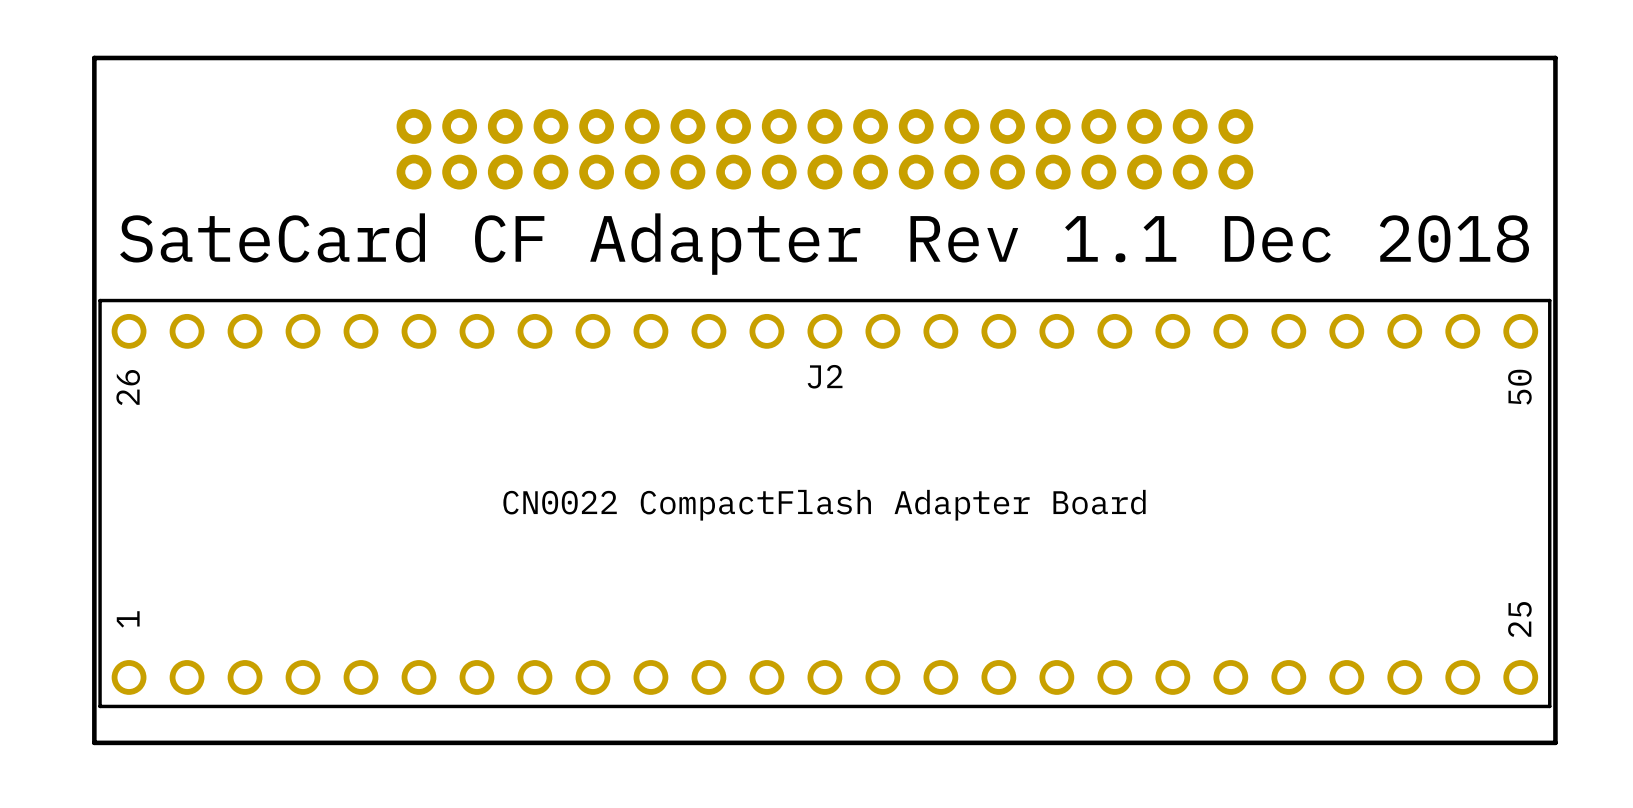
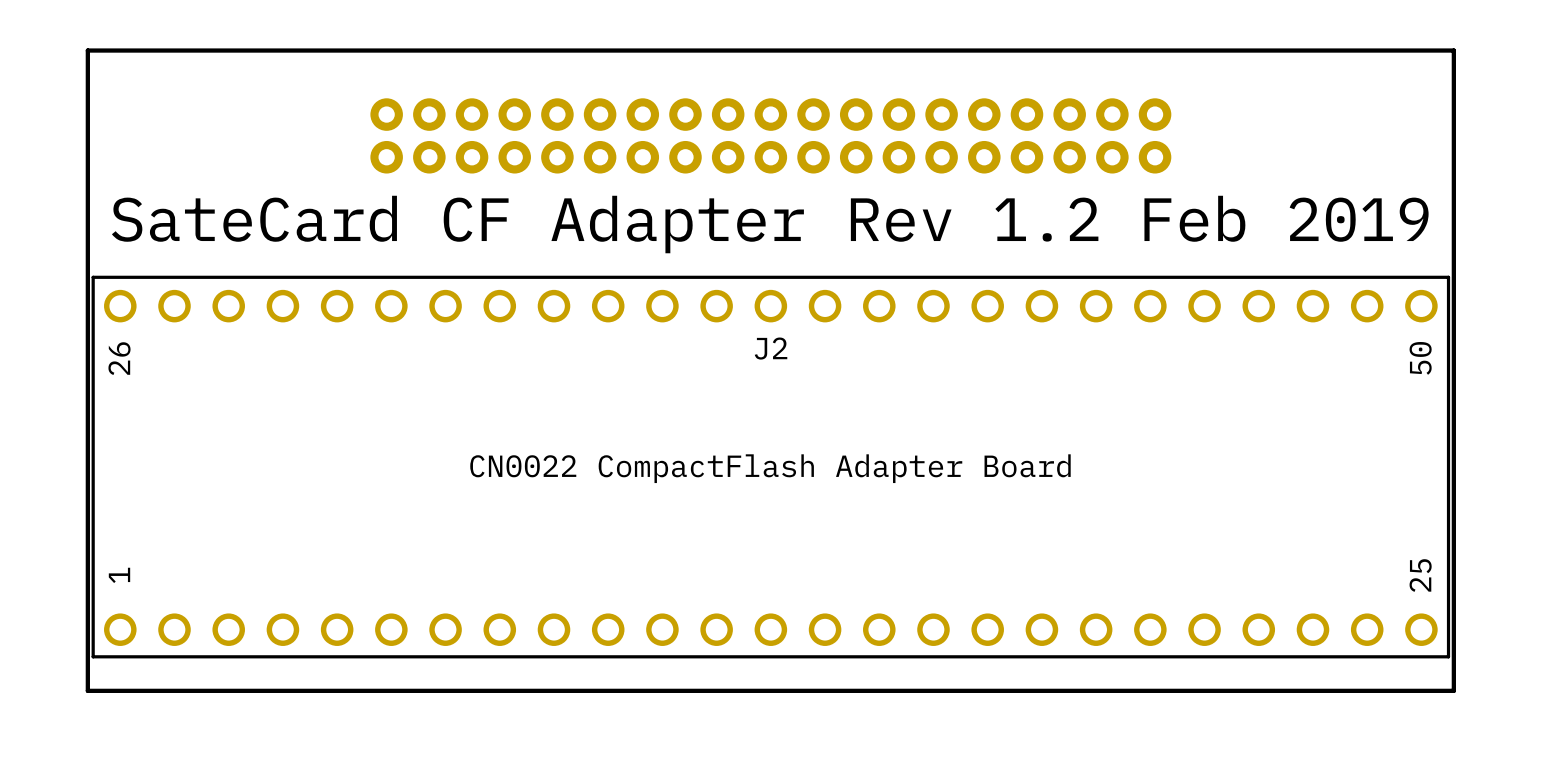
text: Rev 1.1 Dec 2018 (1219, 238) -> Rev 1.2 Feb 2019 (1139, 218)

